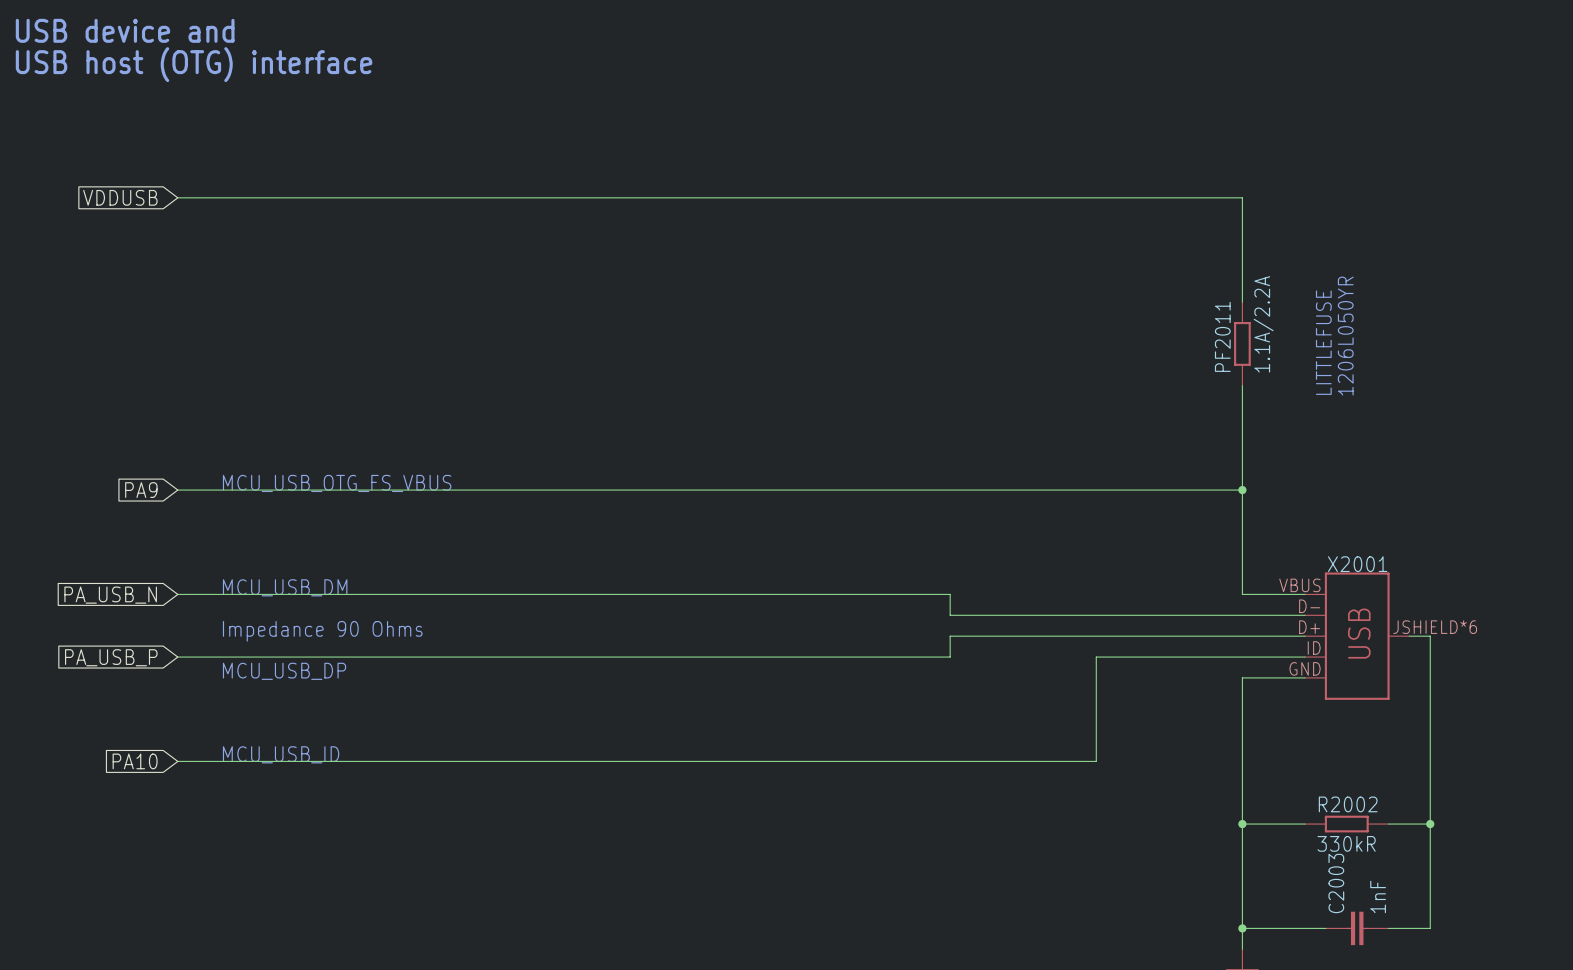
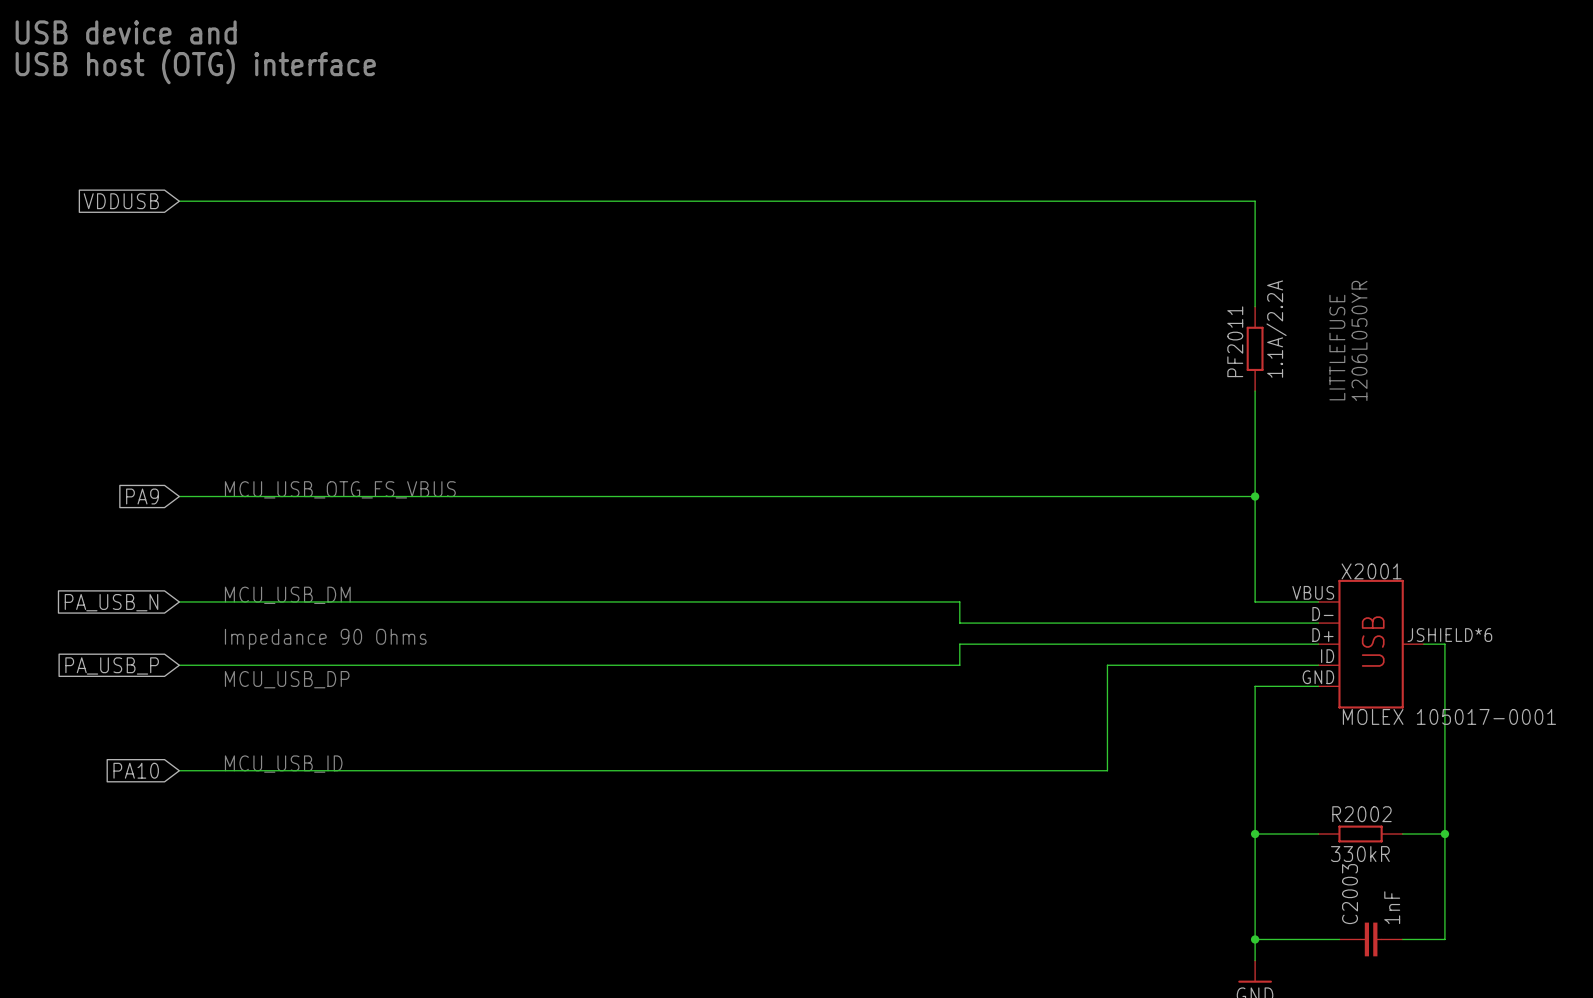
X2001 value: none -> MOLEX 105017-0001 (1449, 716)

